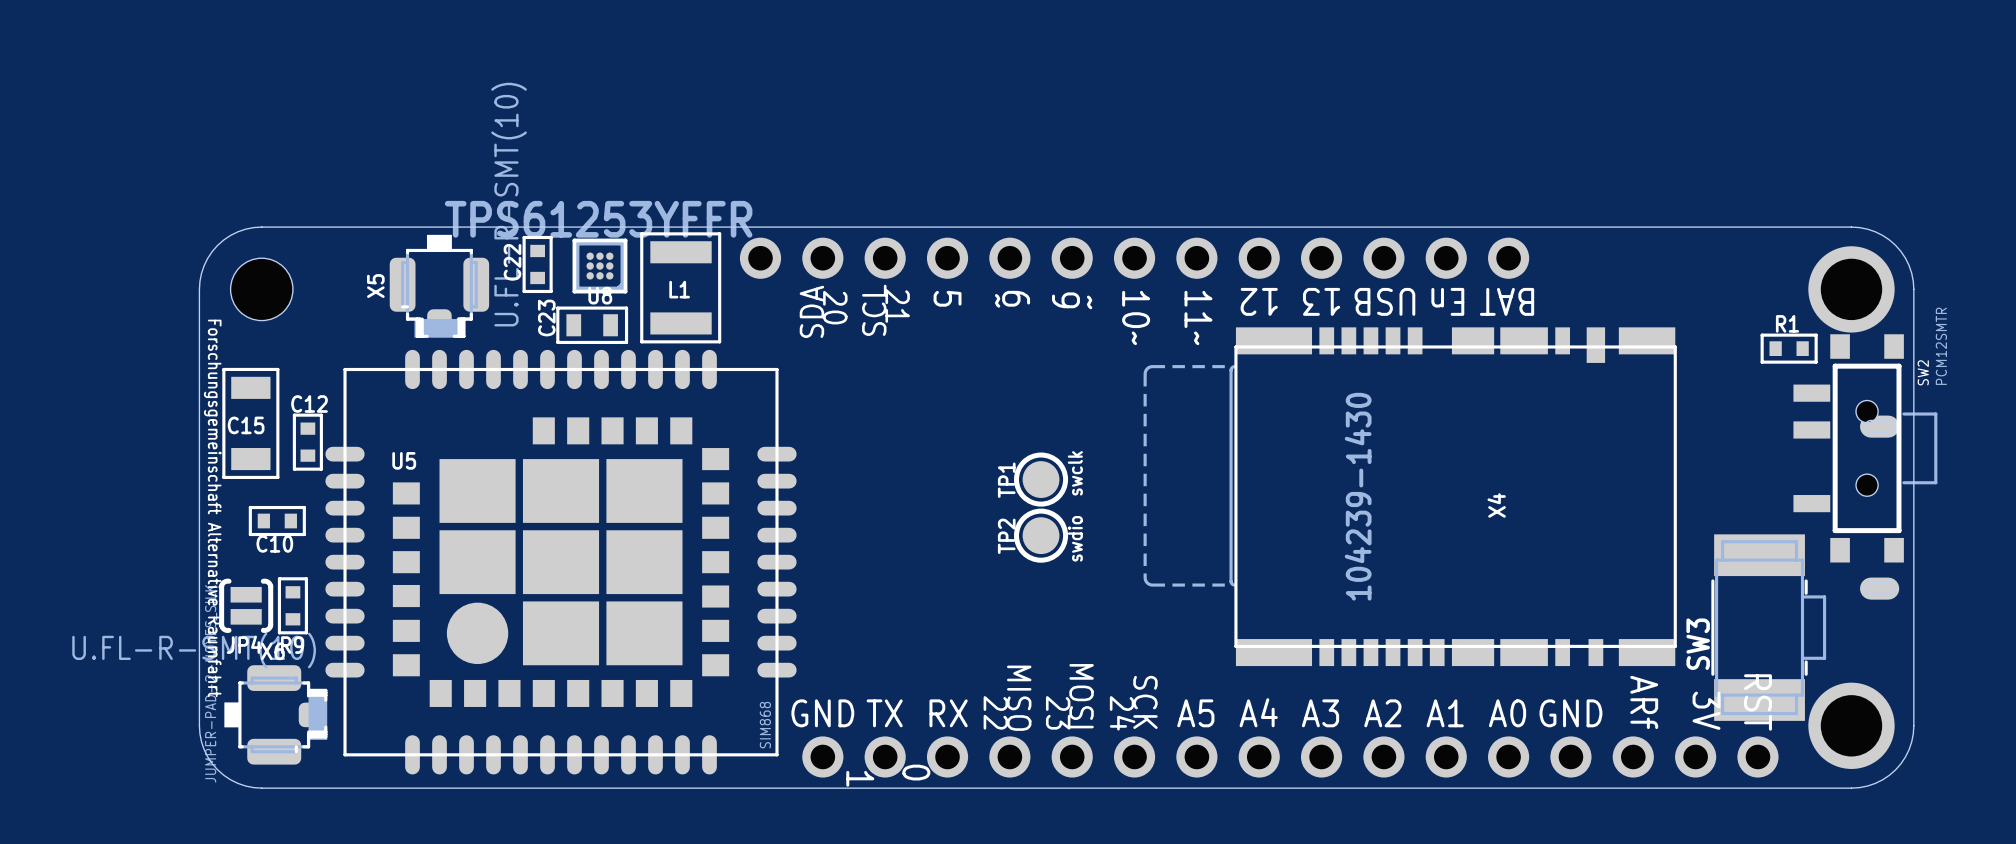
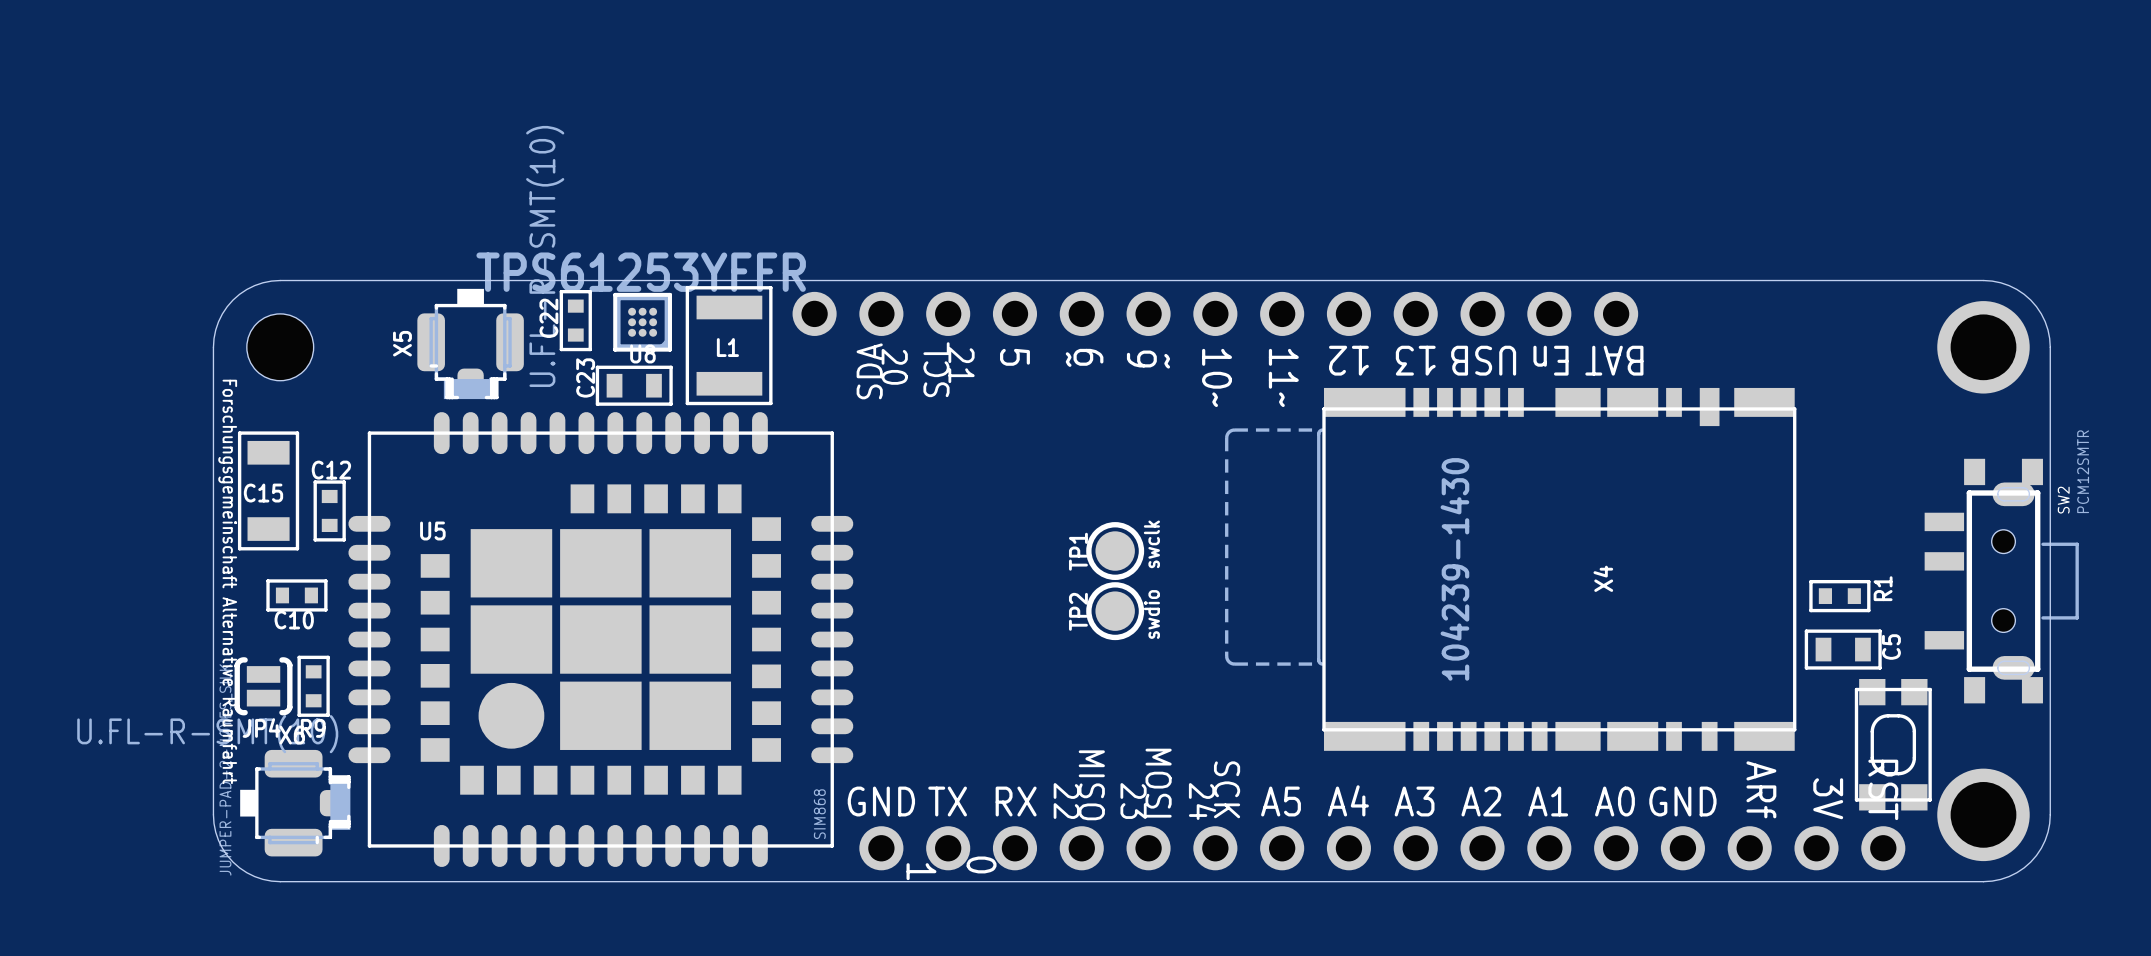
R1 name rotation: 0° (1787, 323) -> 90° counterclockwise (1883, 588)
R1 name position: R1 (1787, 323) -> R1 (1883, 588)
R1 position: (1789, 348) -> (1839, 596)
SW2 position: (1865, 448) -> (2001, 581)
C5: none -> (1843, 649)
SW3: (1768, 627) -> none
part: none -> (1893, 744)

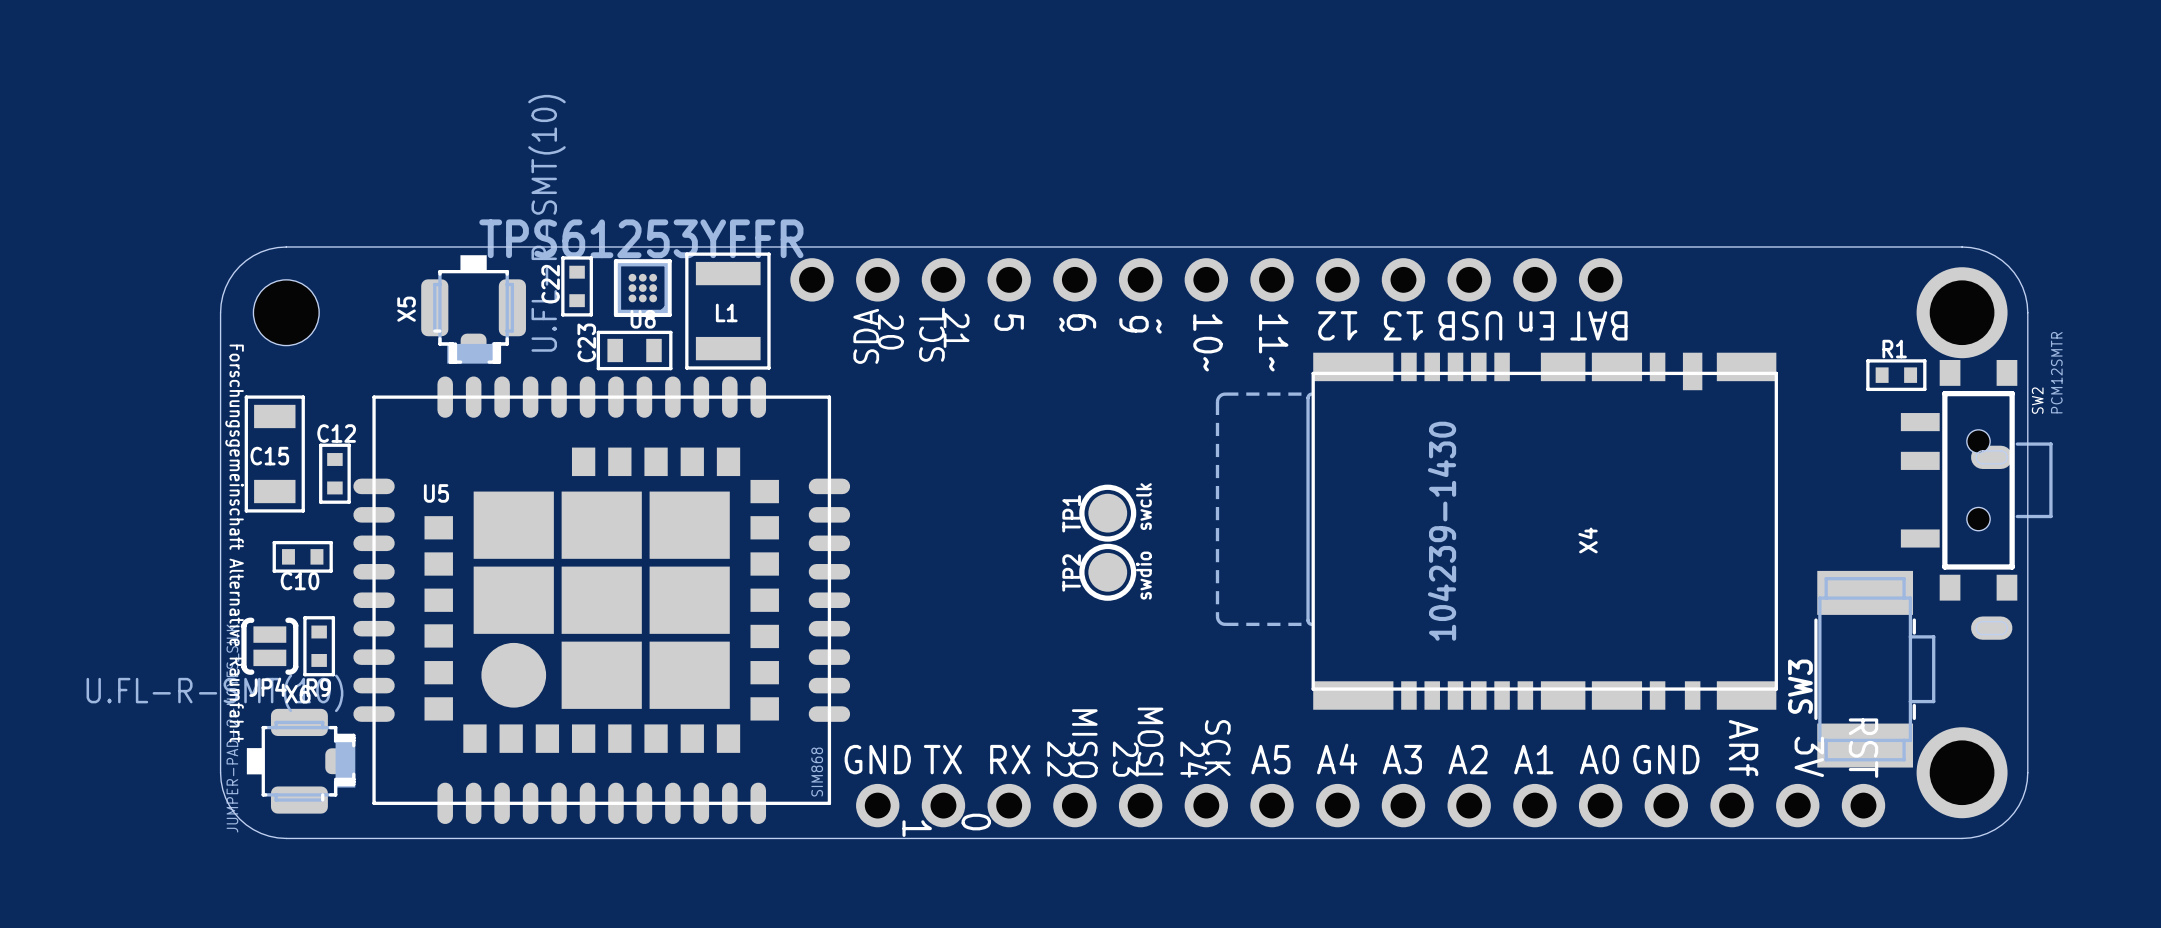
SW2 position: (2001, 581) -> (1976, 480)
R1 name rotation: 0° (1883, 588) -> 90° clockwise (1894, 349)
R1 name position: R1 (1883, 588) -> R1 (1894, 349)
R1 position: (1839, 596) -> (1896, 375)
C5: (1843, 649) -> none
SW3: none -> (1874, 669)
part: (1893, 744) -> none

